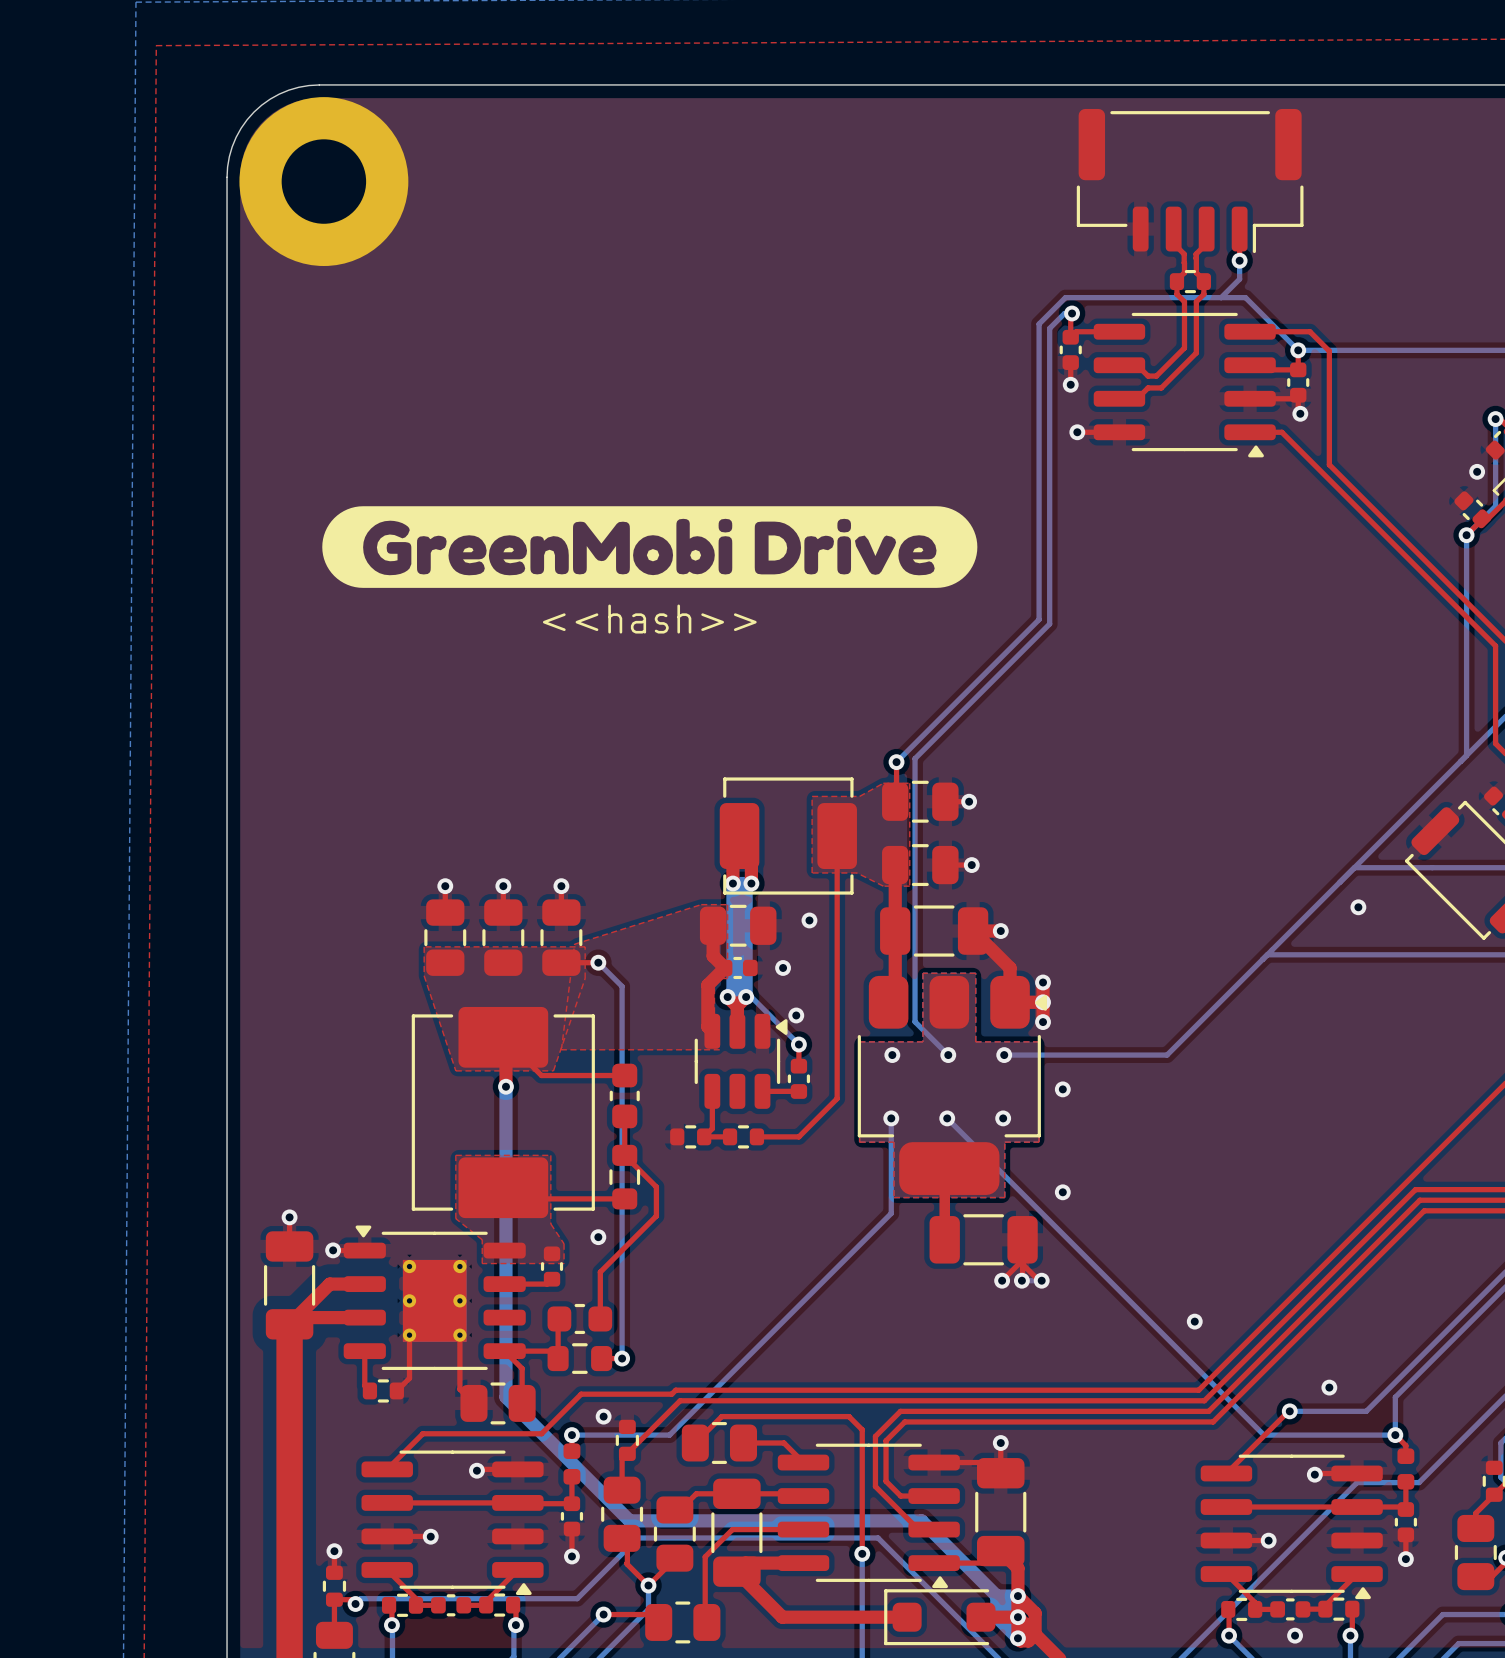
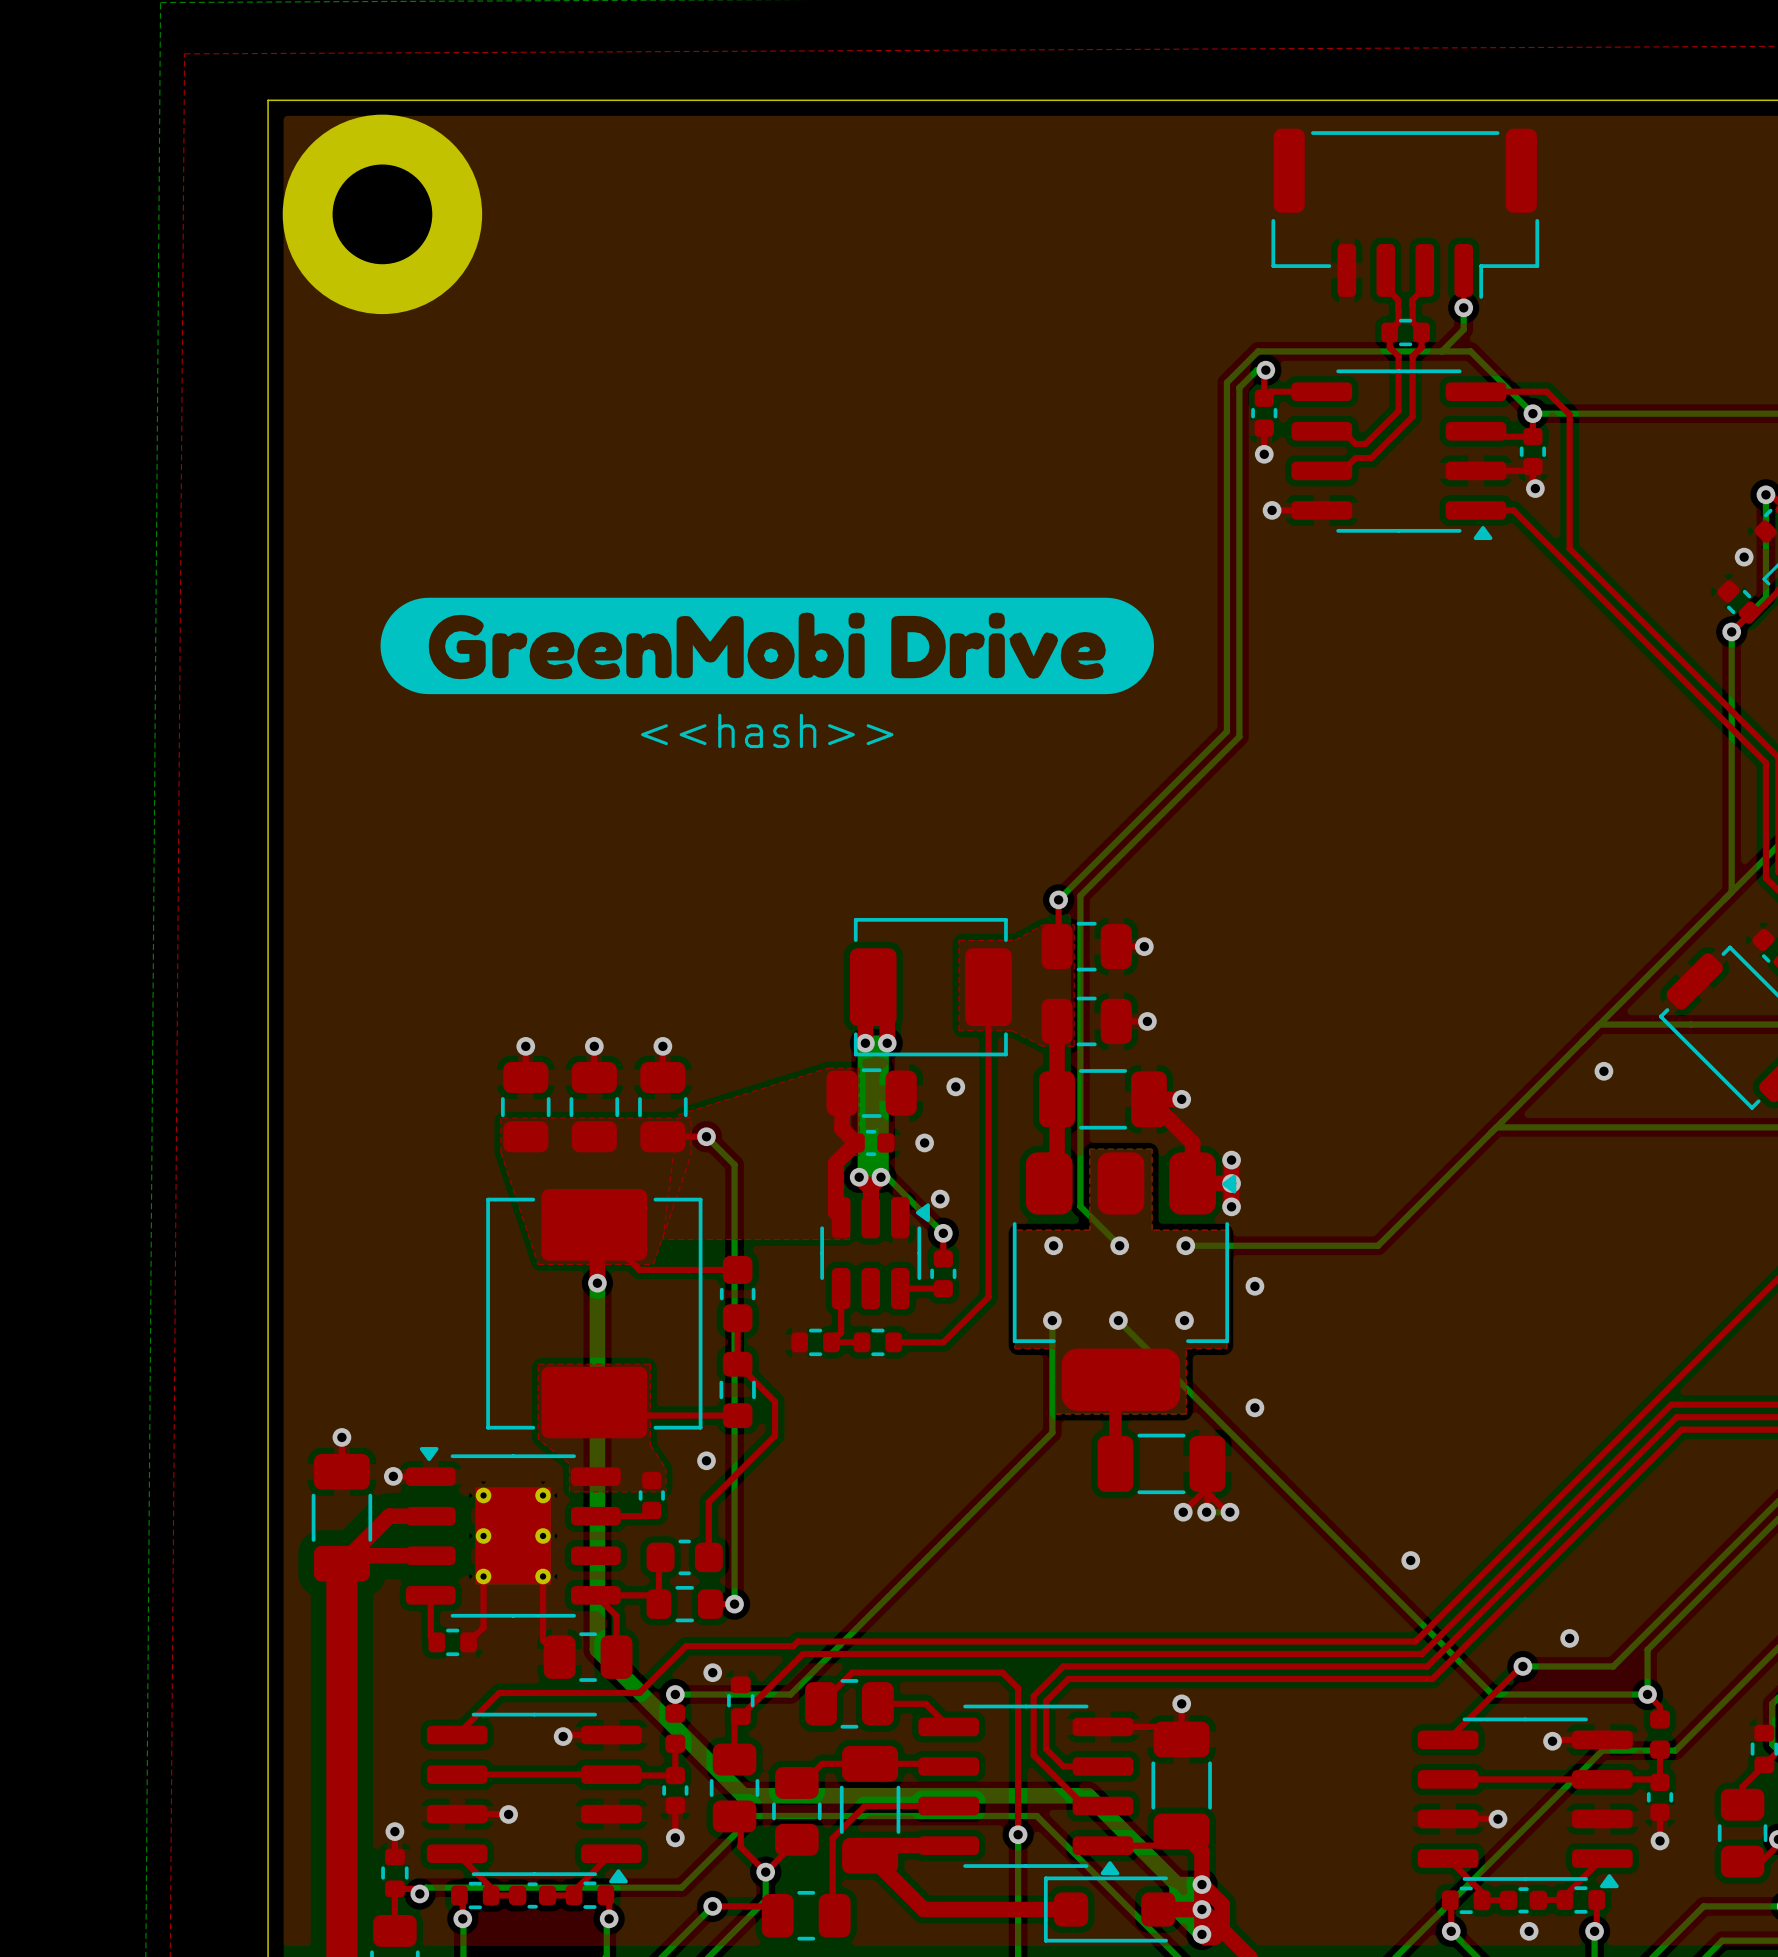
board edge: (319, 84) (298, 87) (279, 94) (254, 112) (241, 128) (232, 146) (227, 177) -> (377, 100) (268, 100) (268, 209)

